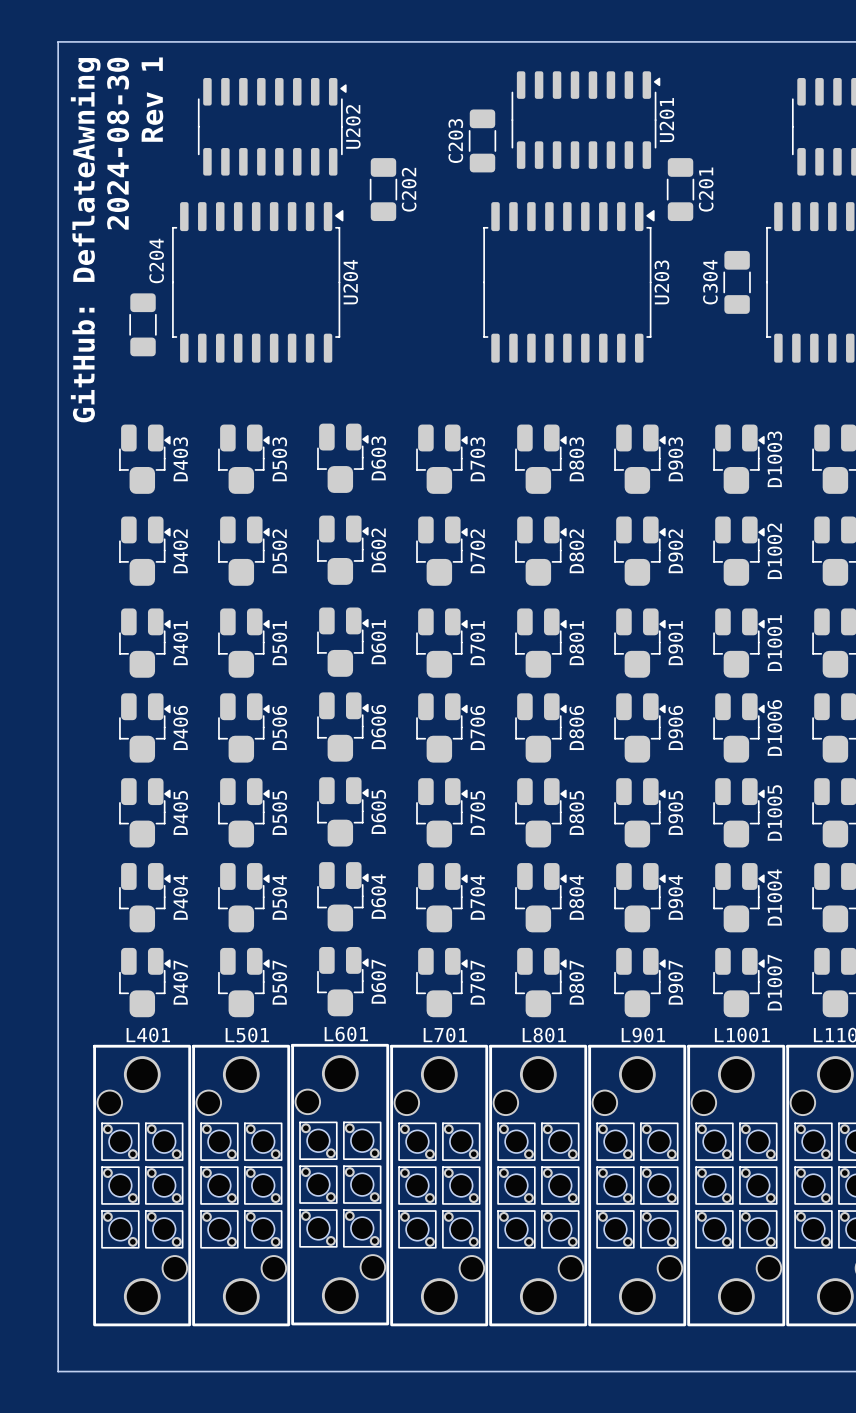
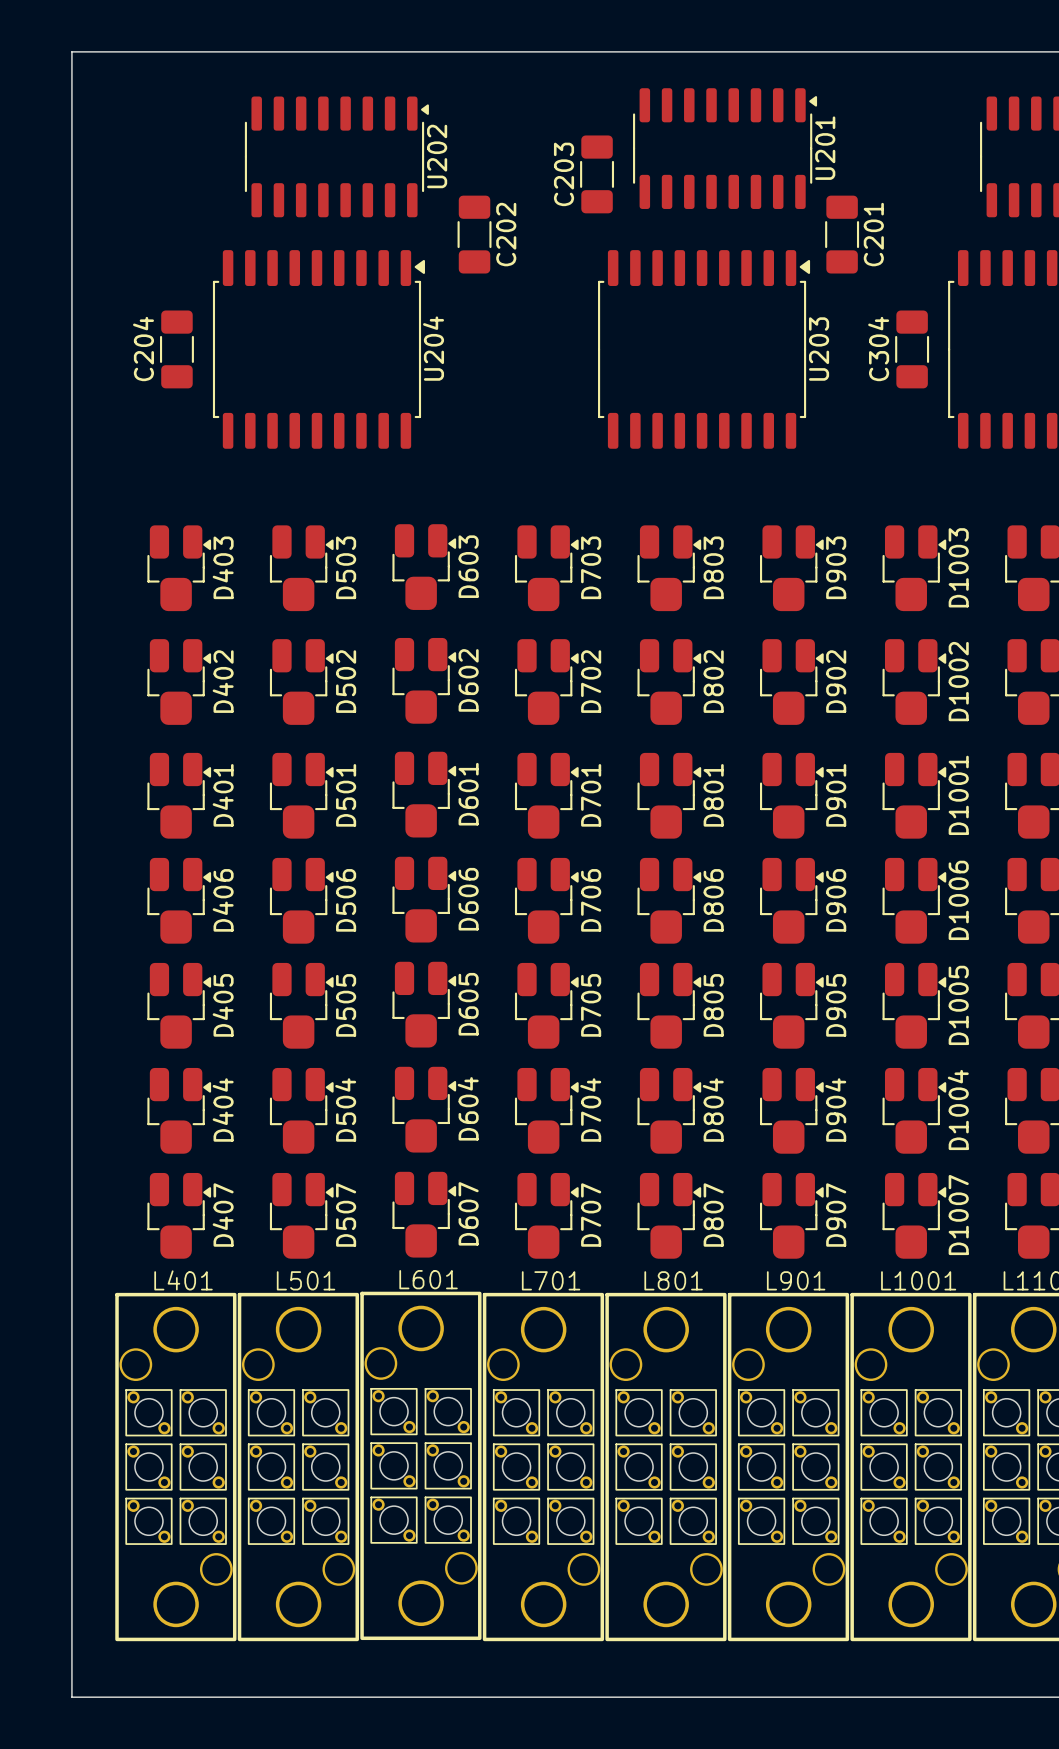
text: Rev 1 (152, 99) -> none
text: 2024-08-30 (118, 143) -> none
text: GitHub: DeflateAwning (85, 240) -> none
C204 name position: C204 (156, 260) -> C204 (143, 349)
C204 position: (143, 324) -> (176, 349)

